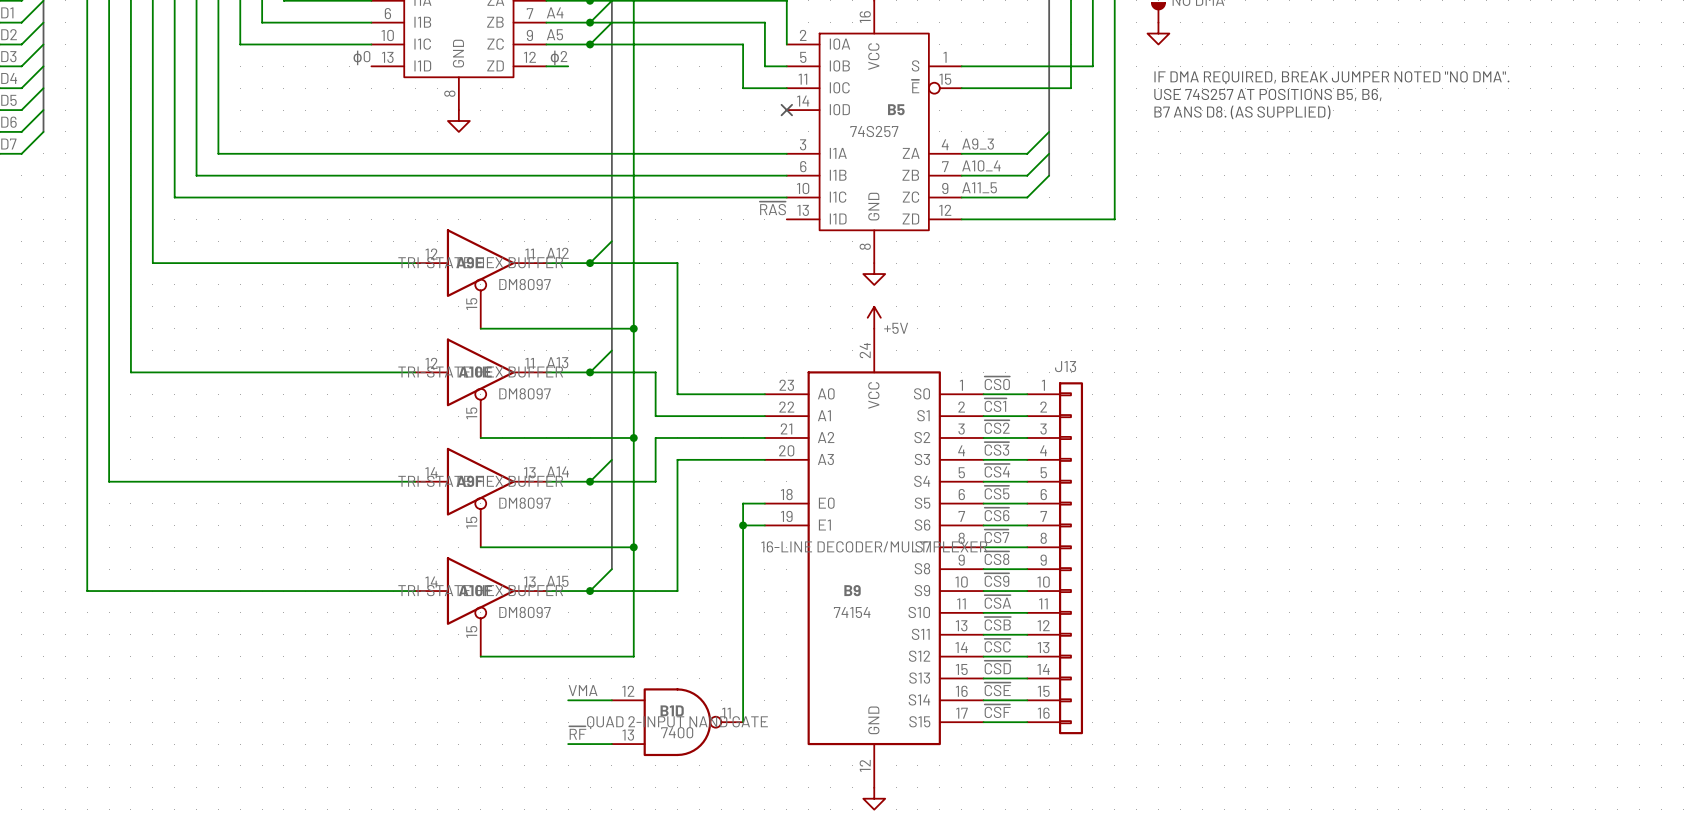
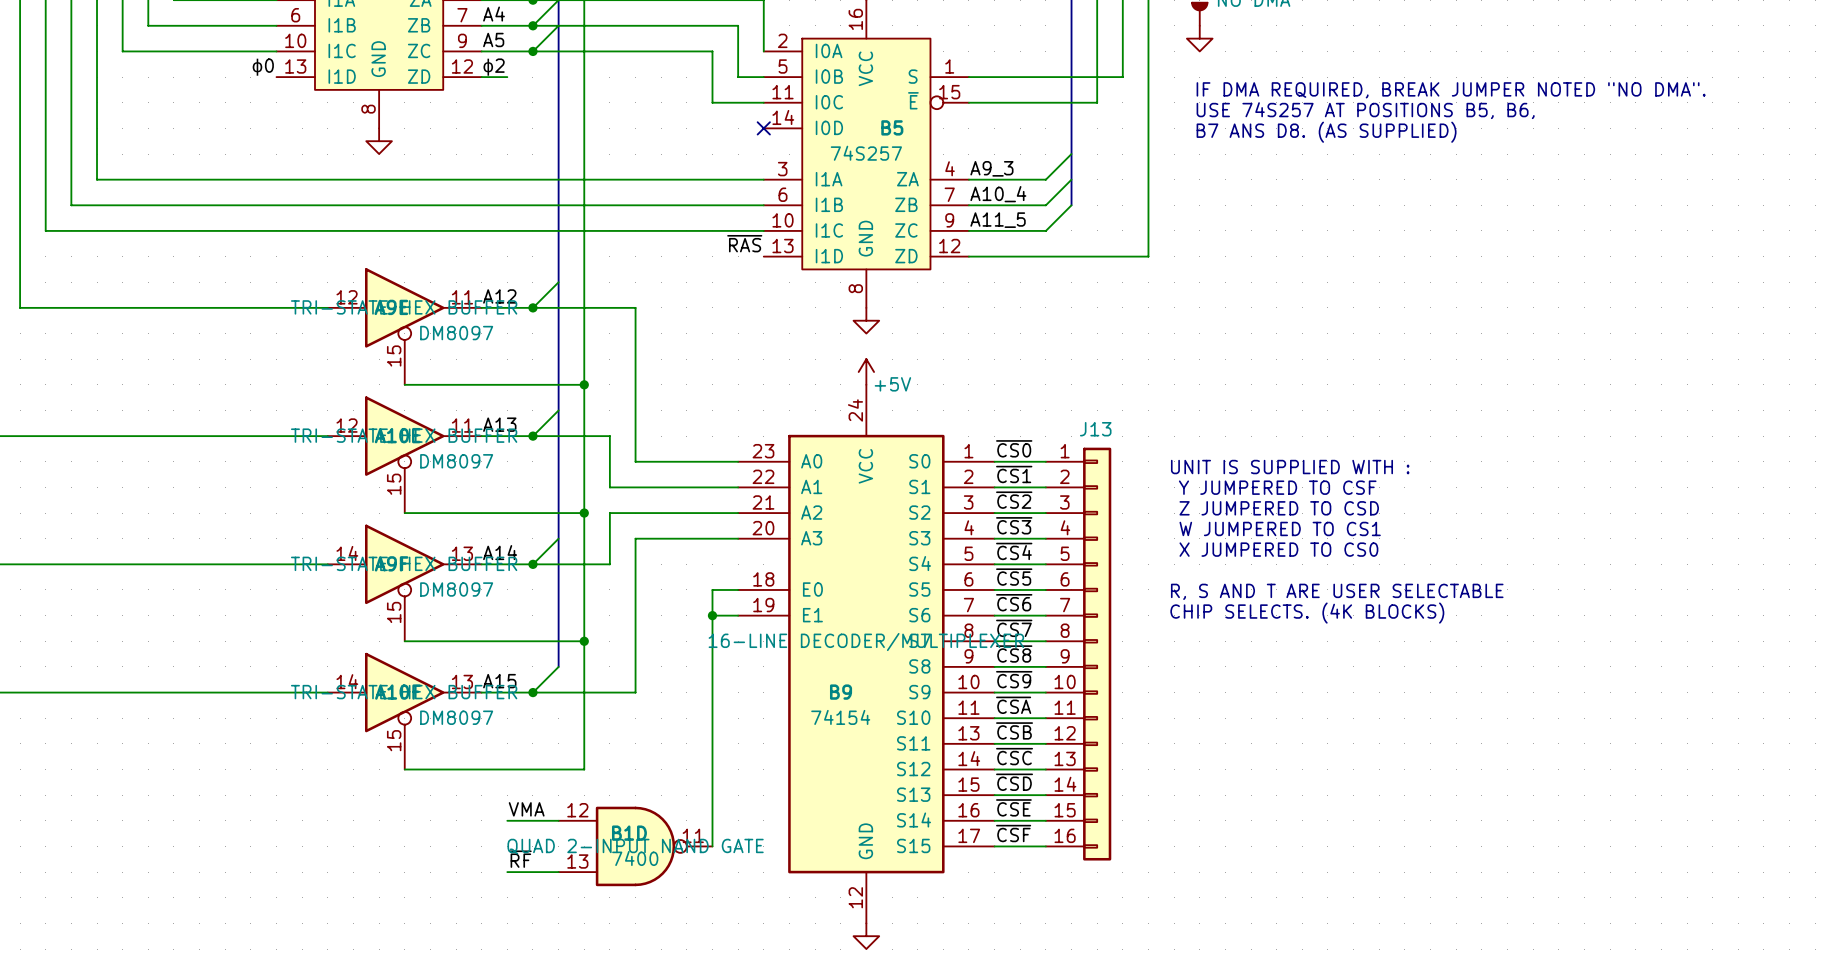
text: none -> UNIT IS SUPPLIED WITH : (1290, 467)
text: none -> Y JUMPERED TO CSF (1277, 487)
text: none -> Z JUMPERED TO CSD (1279, 508)
text: none -> W JUMPERED TO CS1 (1280, 528)
text: none -> X JUMPERED TO CS0 (1278, 549)
text: none -> R, S AND T ARE USER SELECTABLE (1337, 591)
text: none -> CHIP SELECTS. (4K BLOCKS) (1307, 613)

